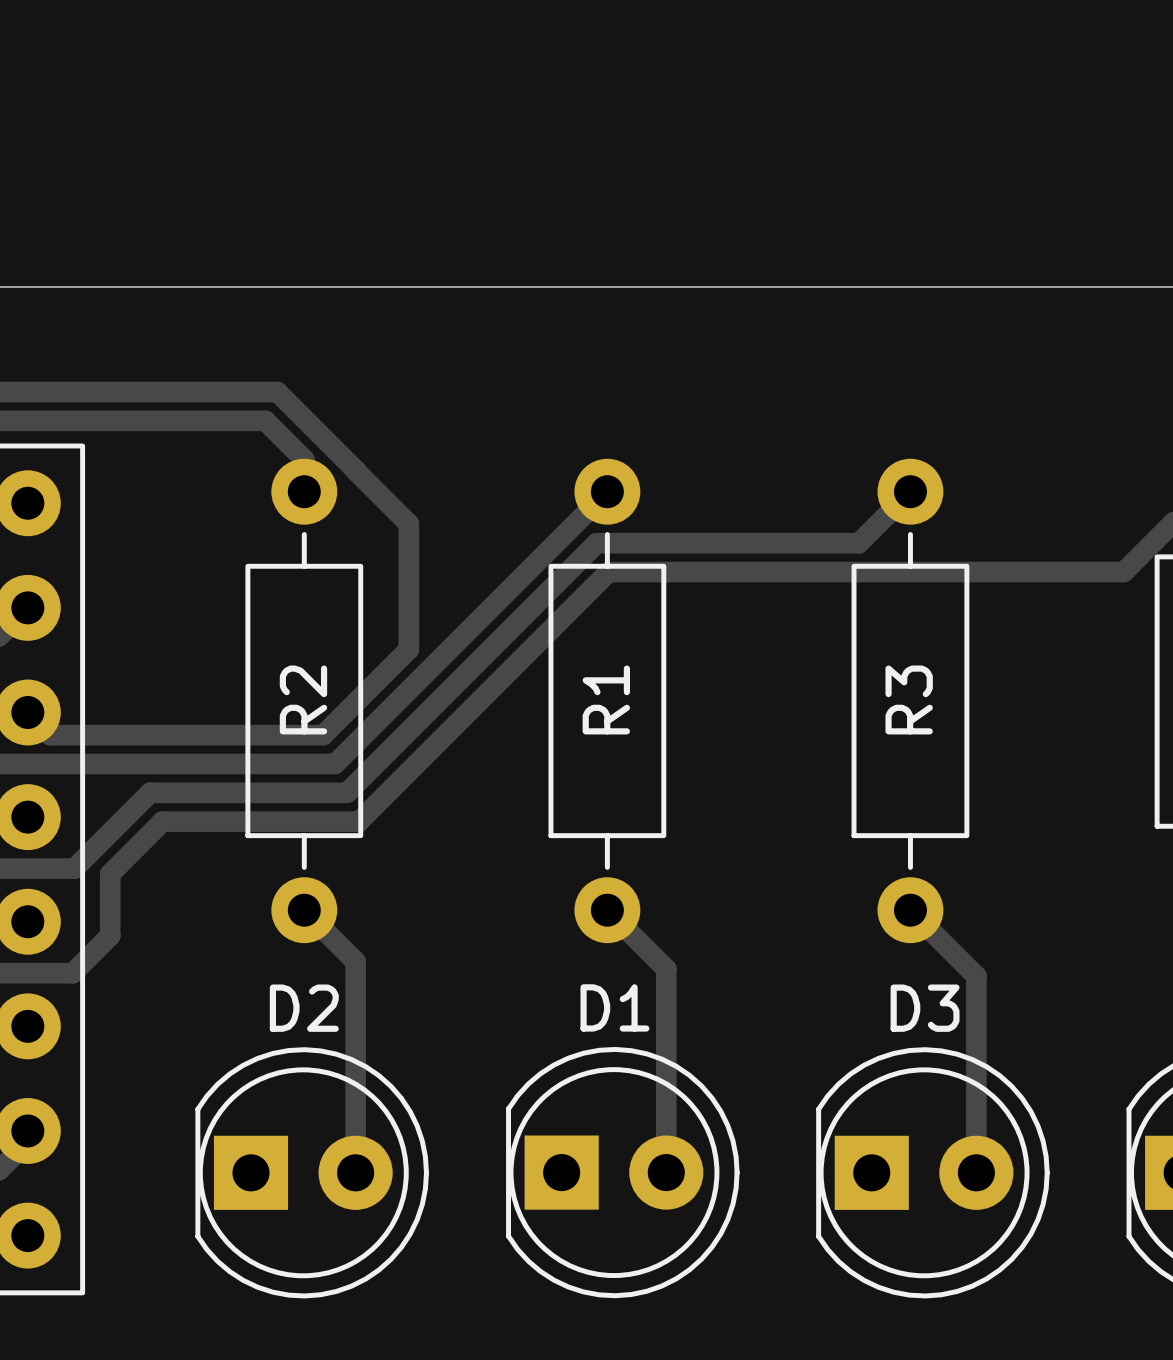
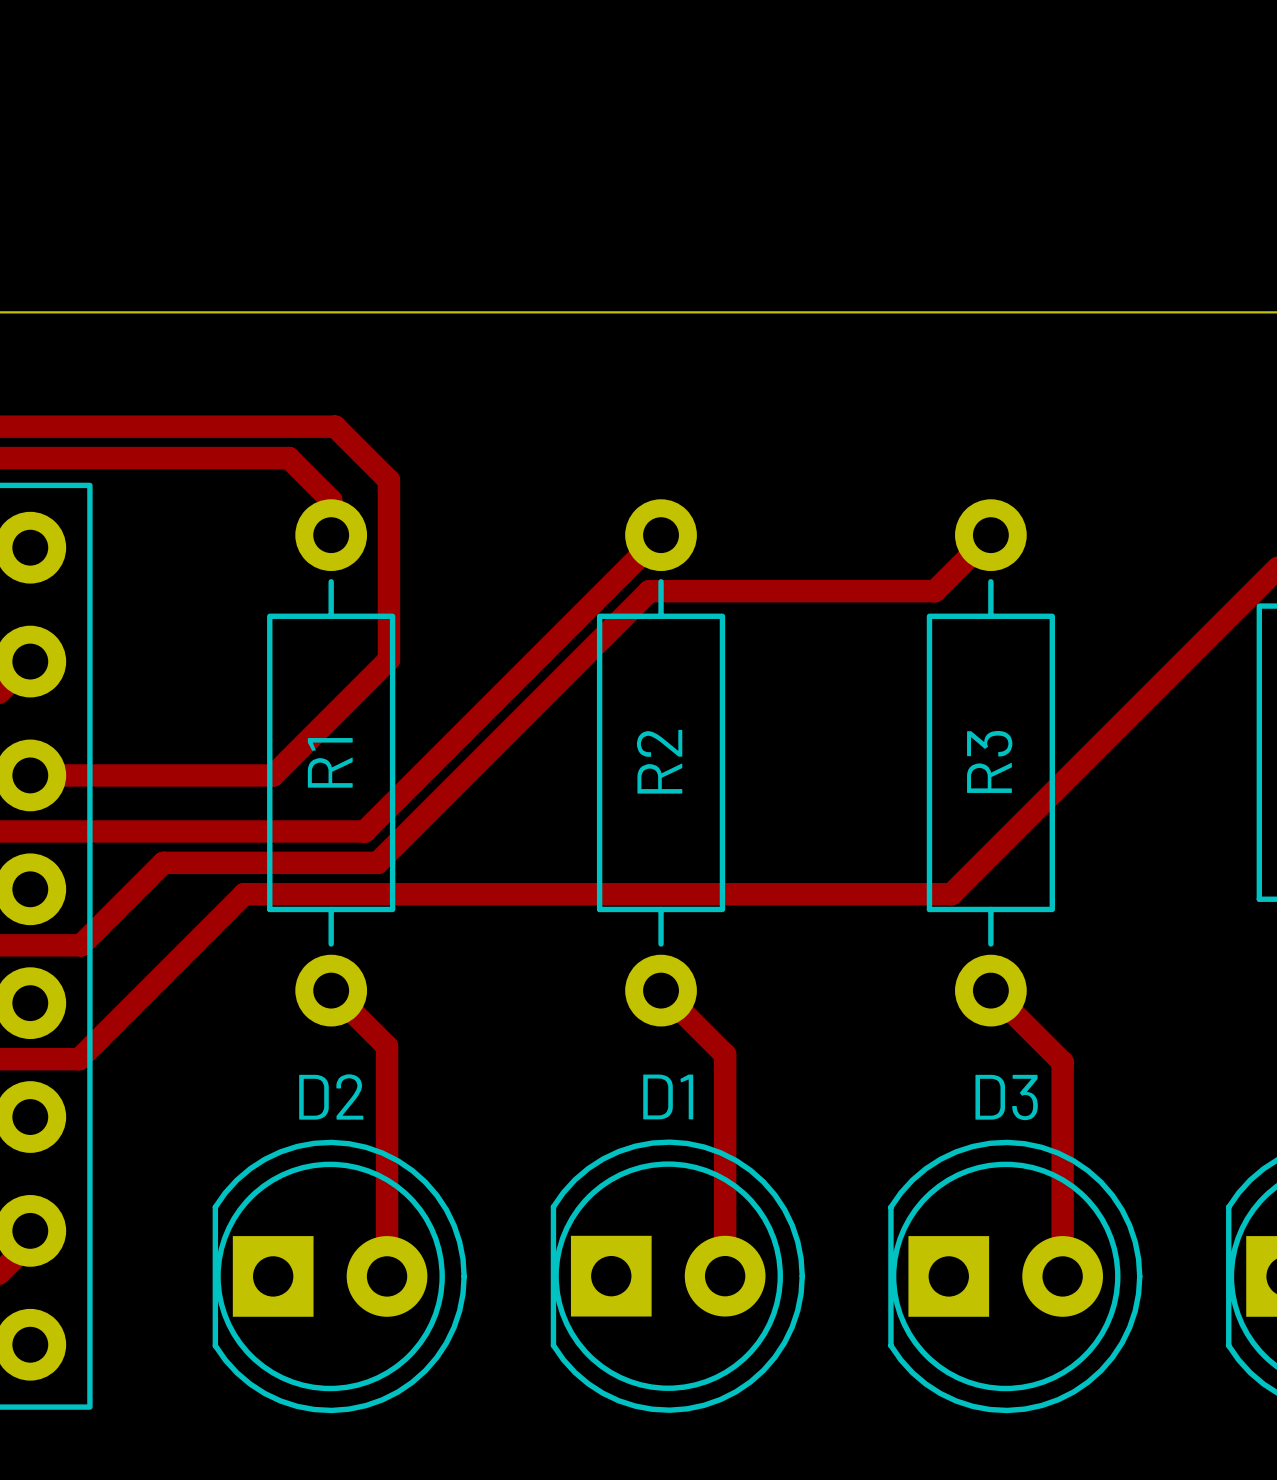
track: (277, 392) (355, 470) -> none
track: (355, 470) (408, 523) (408, 649) (323, 735) (50, 735) (27, 712) -> (301, 426) (335, 426) (388, 480) (388, 659) (273, 775) (30, 775)
track: (1123, 572) (608, 572) (359, 821) -> (1223, 622) (951, 894) (390, 894)
R2 name: R2 (303, 699) -> R1 (330, 762)
R1 name: R1 (606, 699) -> R2 (659, 761)
track: (224, 821) (162, 821) (110, 873) (110, 935) -> (244, 894) (119, 1018)

